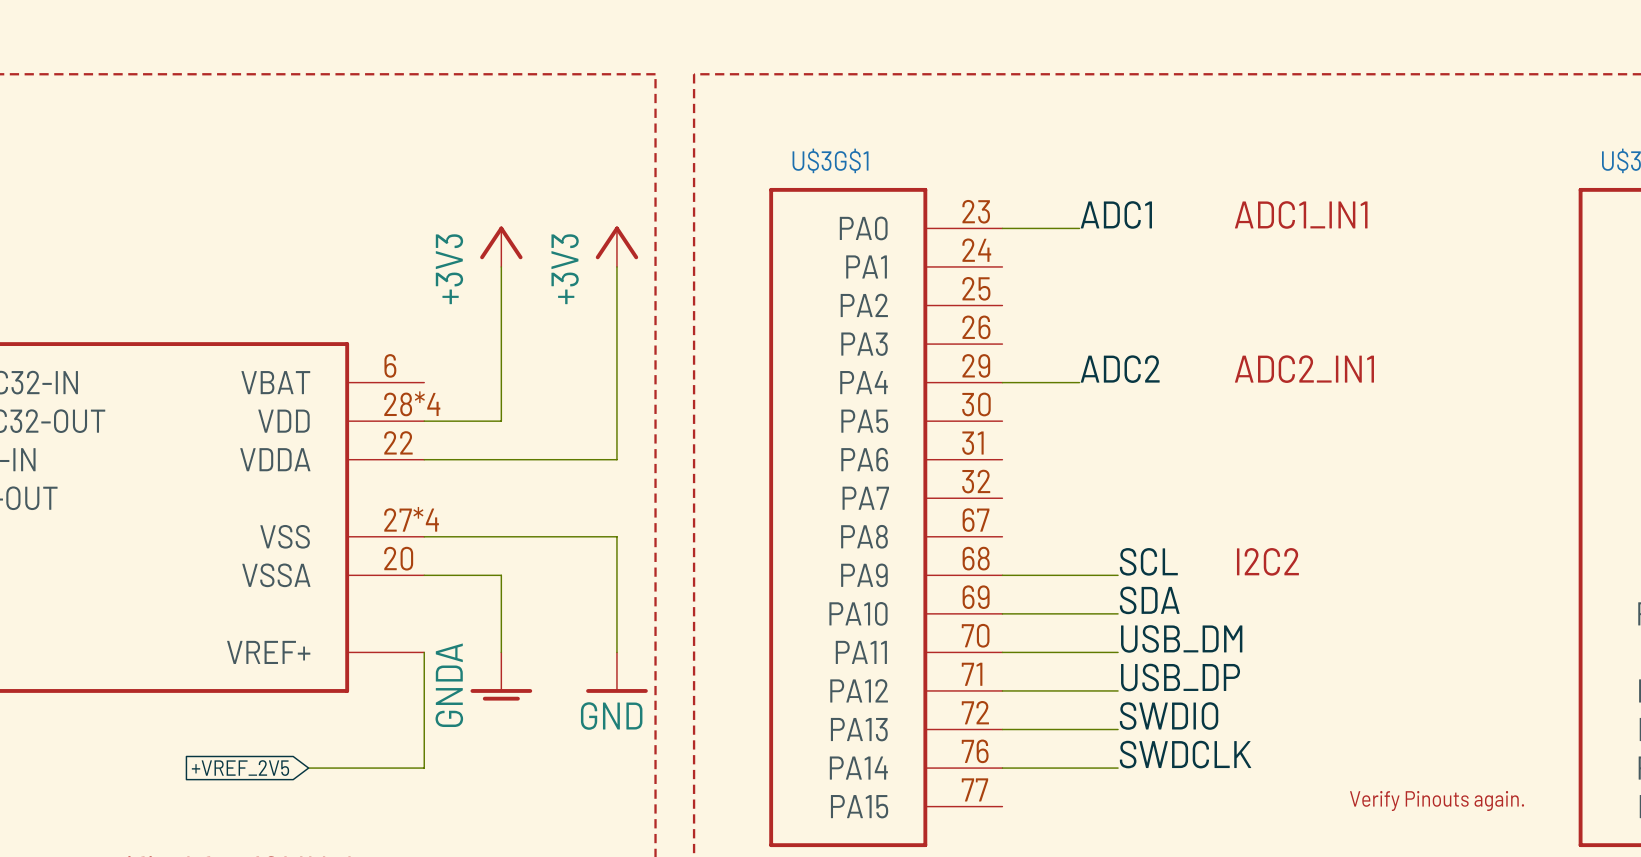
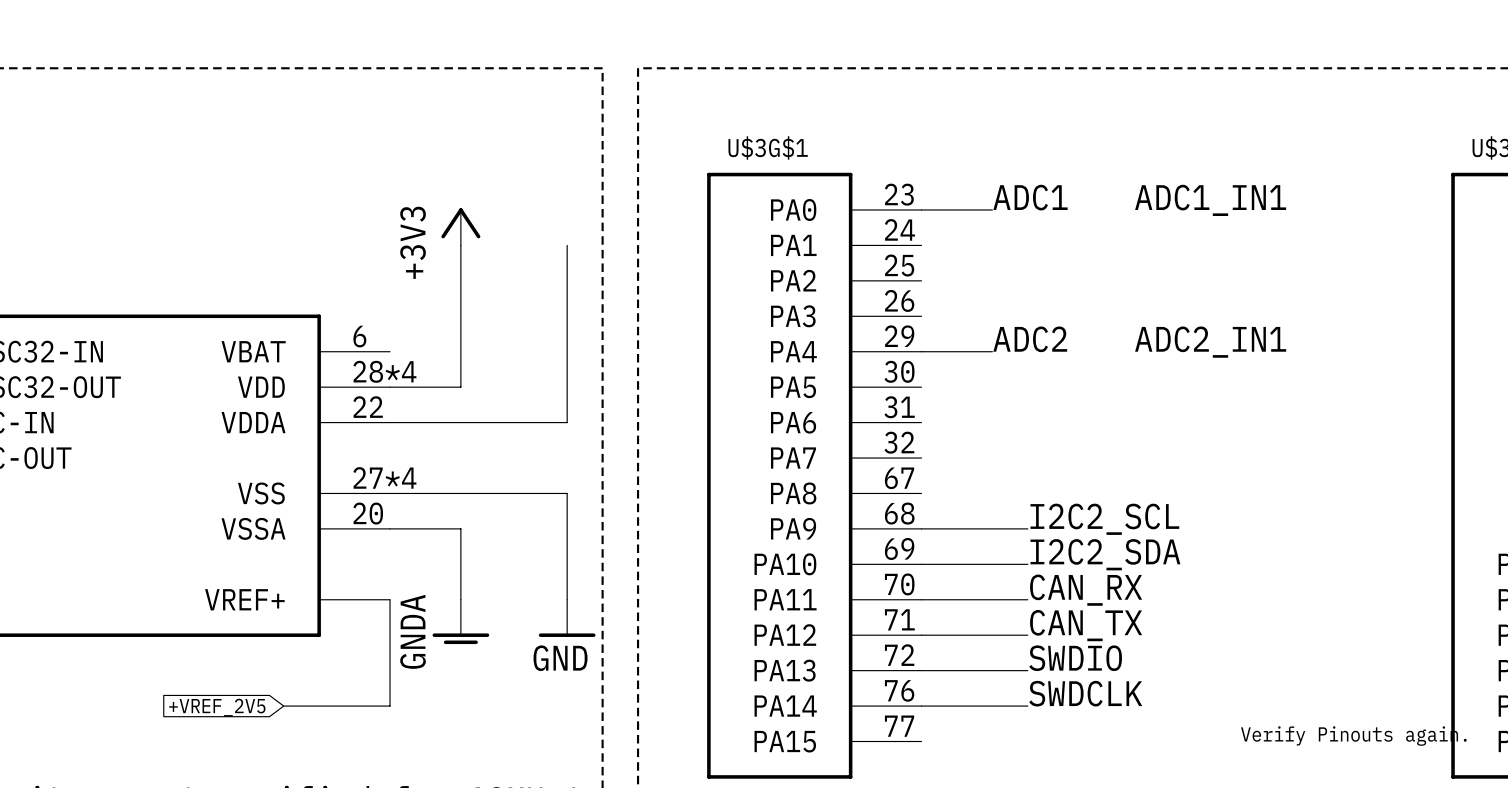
power symbol: +3V3 (616, 246) -> none
label: SCL (1148, 561) -> I2C2_SCL (1104, 519)
text: I2C2 (1267, 561) -> none
label: SDA (1149, 600) -> I2C2_SDA (1105, 554)
label: USB_DM (1181, 638) -> CAN_RX (1086, 590)
label: USB_DP (1180, 677) -> CAN_TX (1086, 625)

